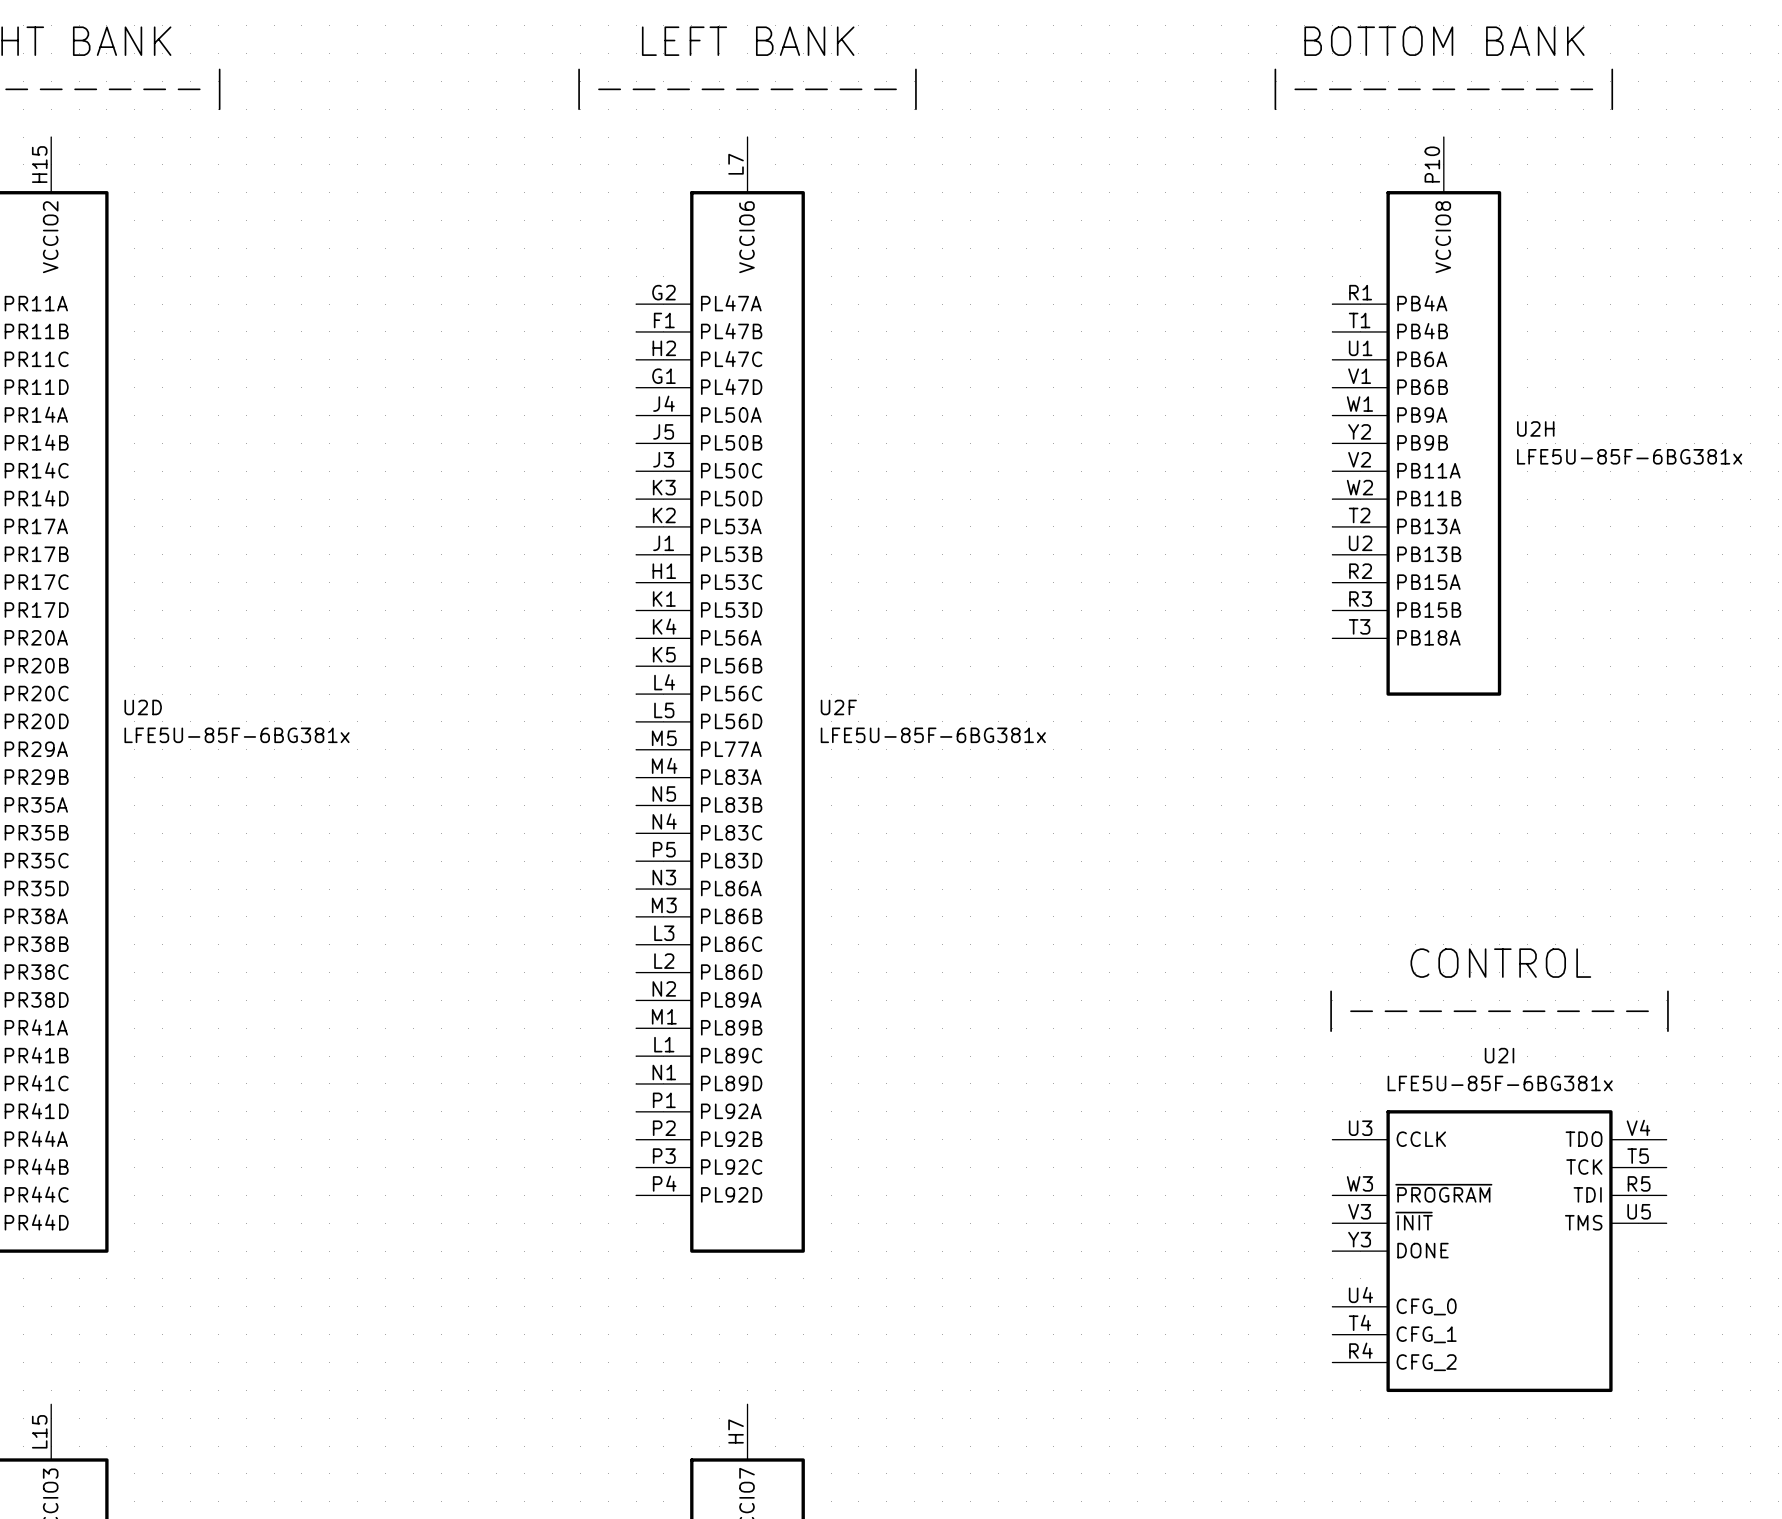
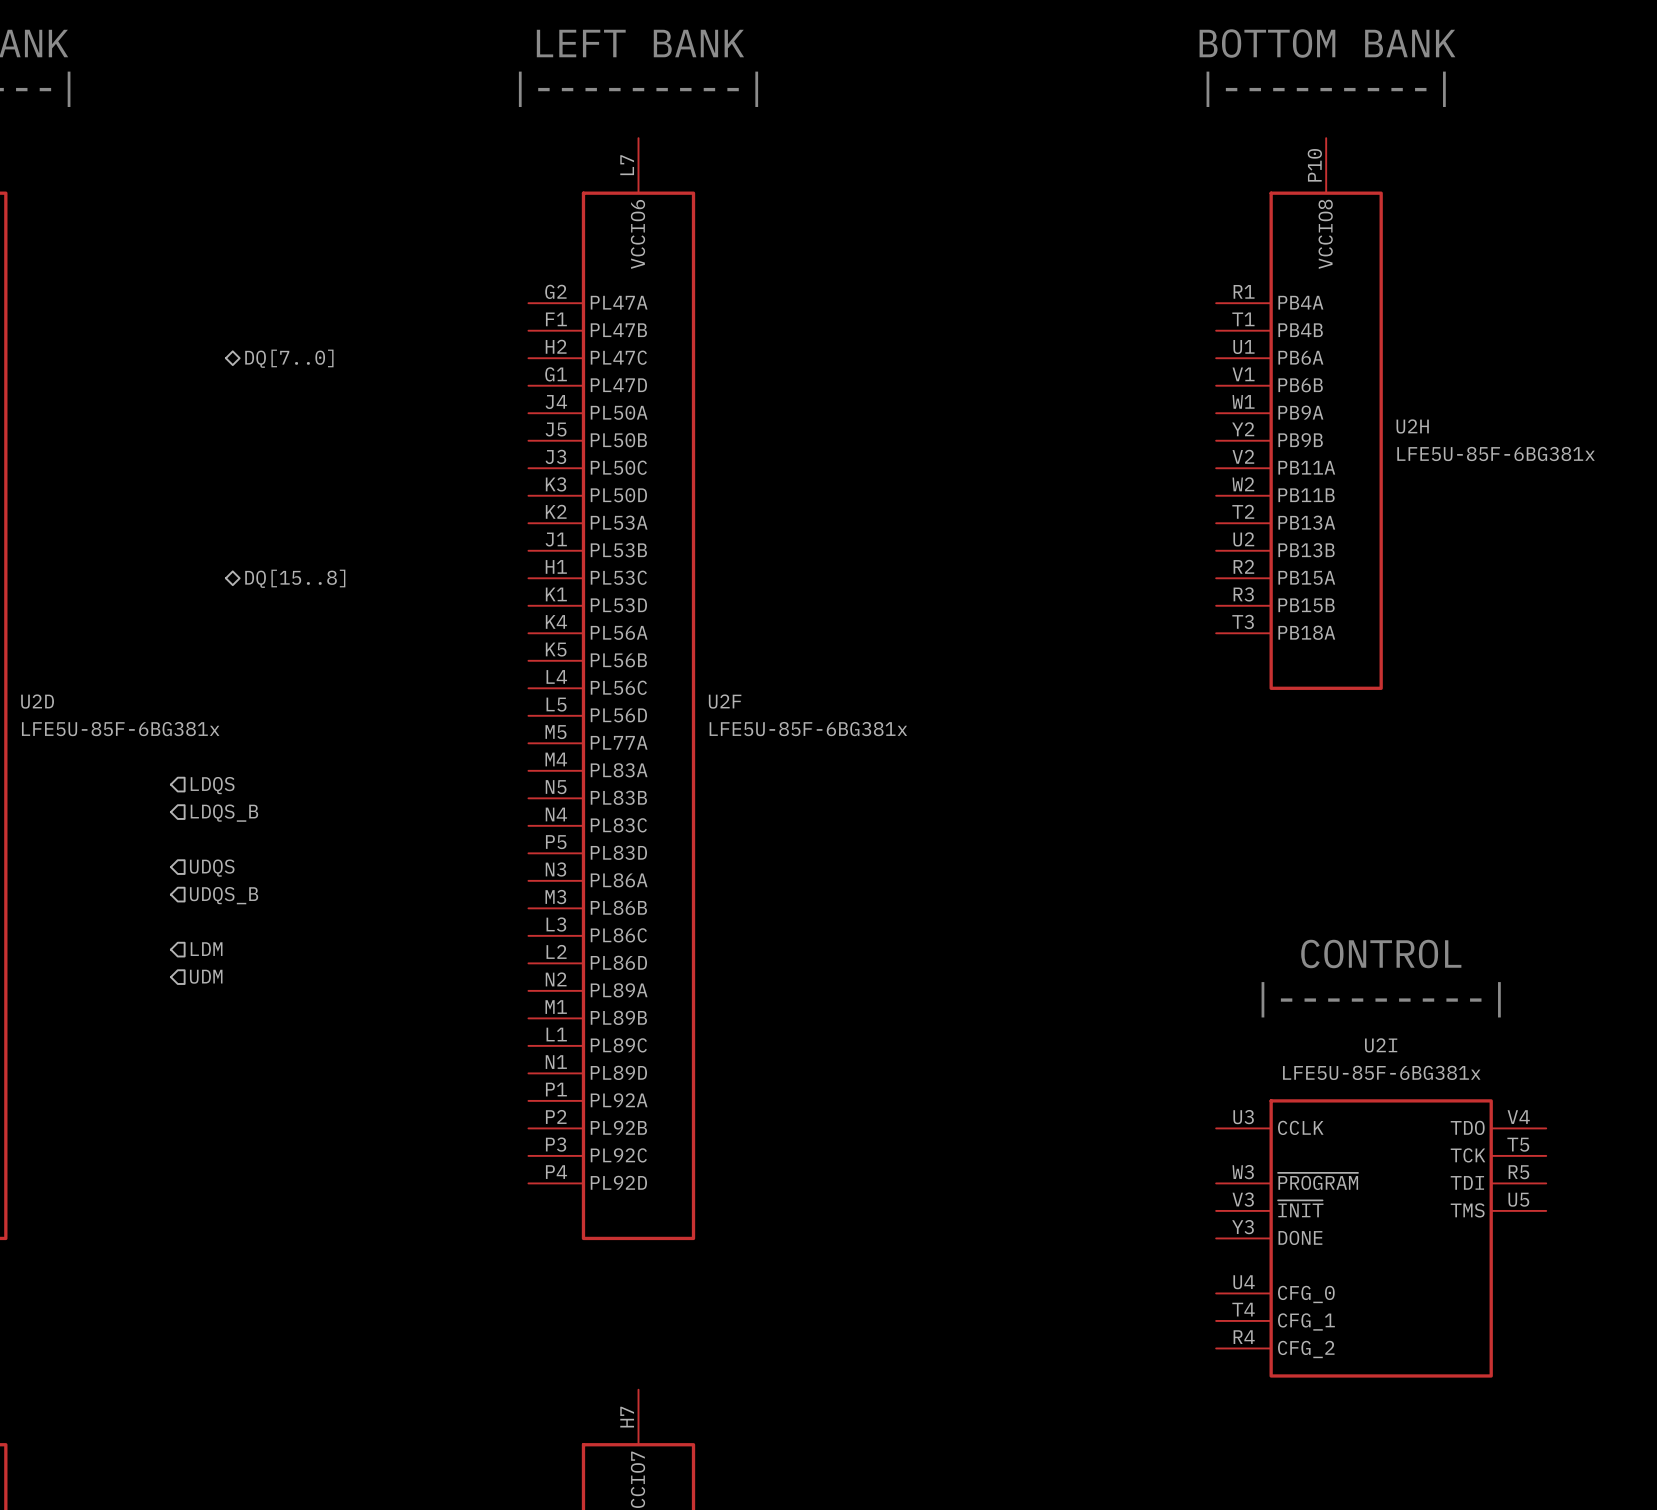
hierarchical label: none -> DQ[7..0] (289, 358)
hierarchical label: none -> DQ[15..8] (295, 578)
hierarchical label: none -> LDQS (212, 785)
hierarchical label: none -> LDQS_B (224, 813)
hierarchical label: none -> UDQS (212, 868)
hierarchical label: none -> UDQS_B (224, 895)
hierarchical label: none -> LDM (206, 949)
hierarchical label: none -> UDM (206, 976)

